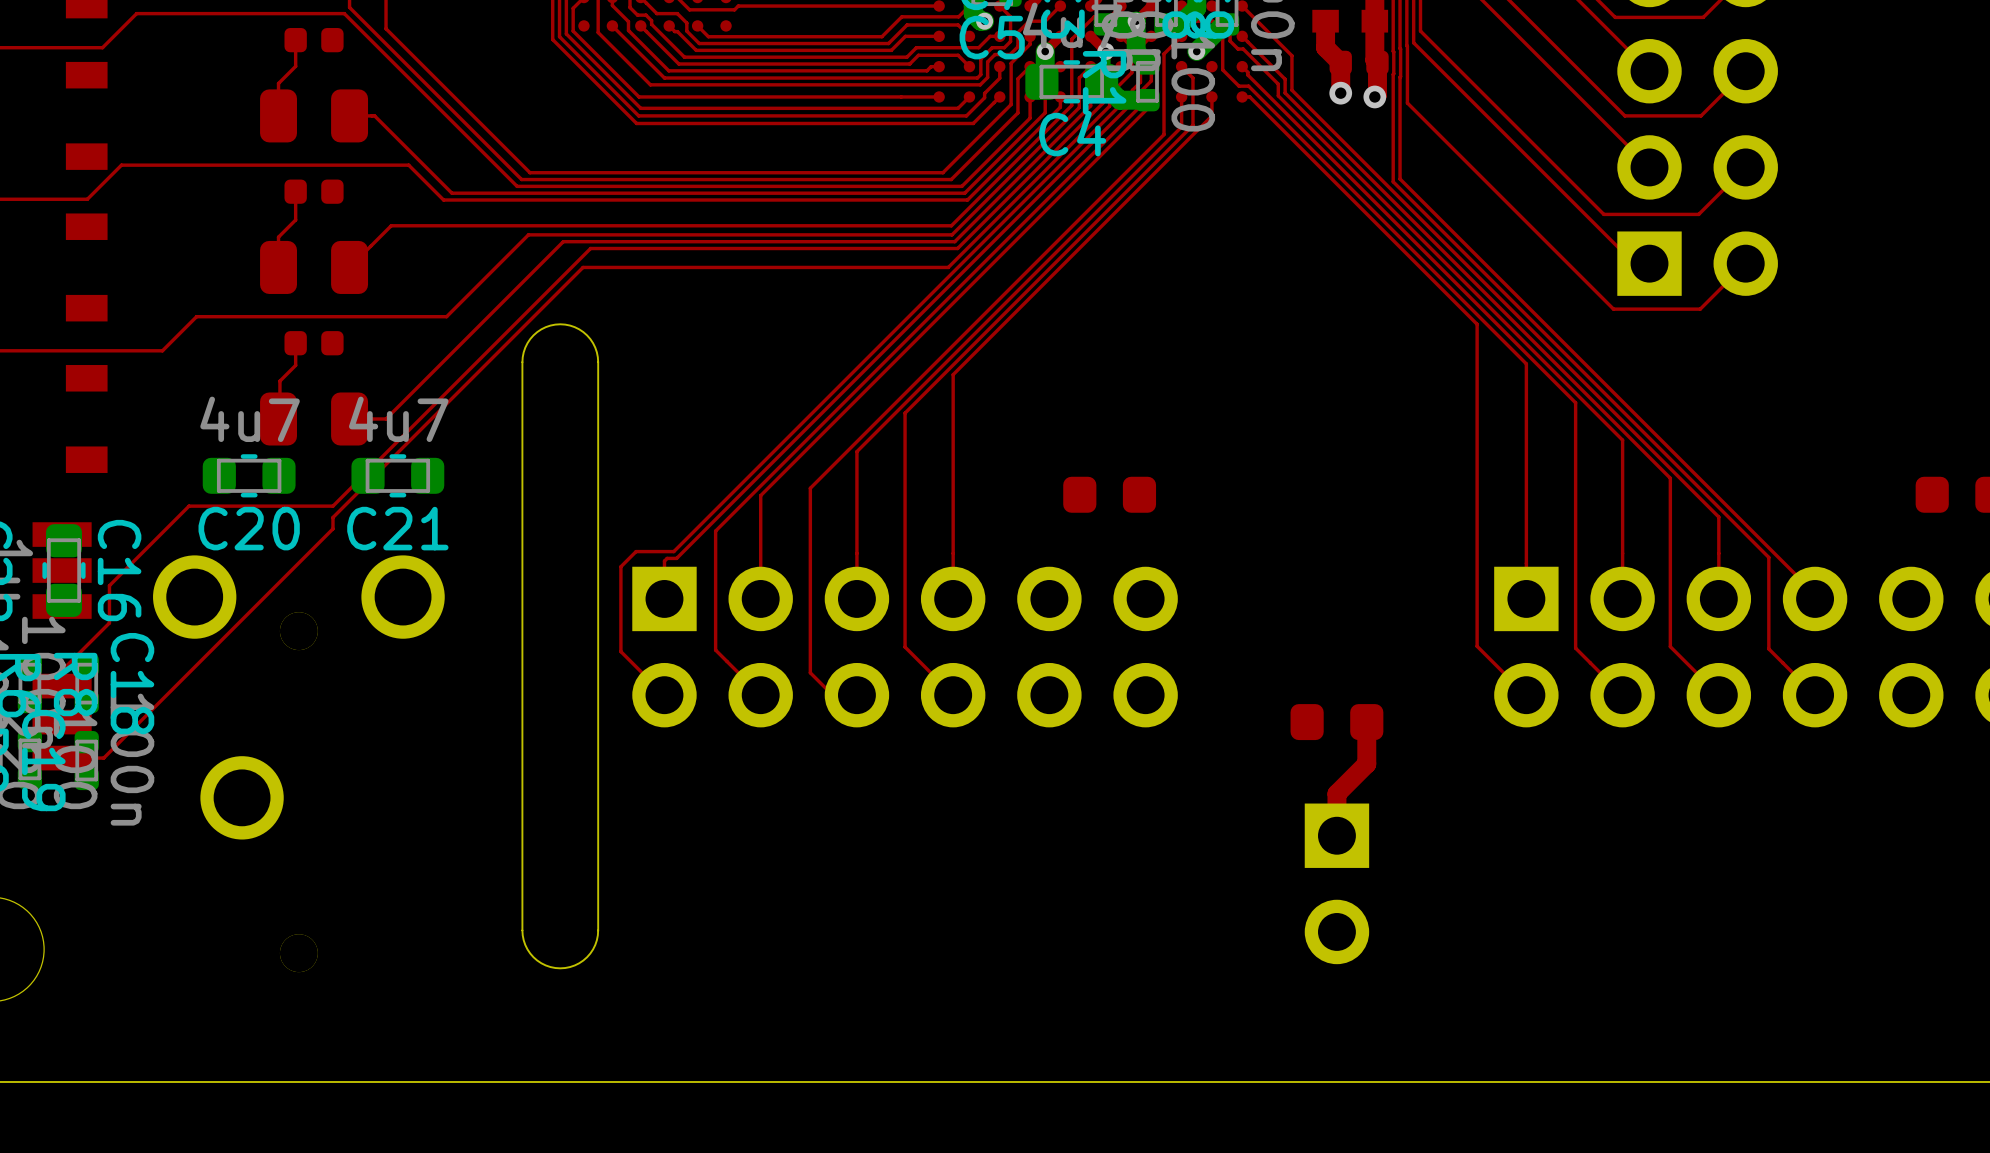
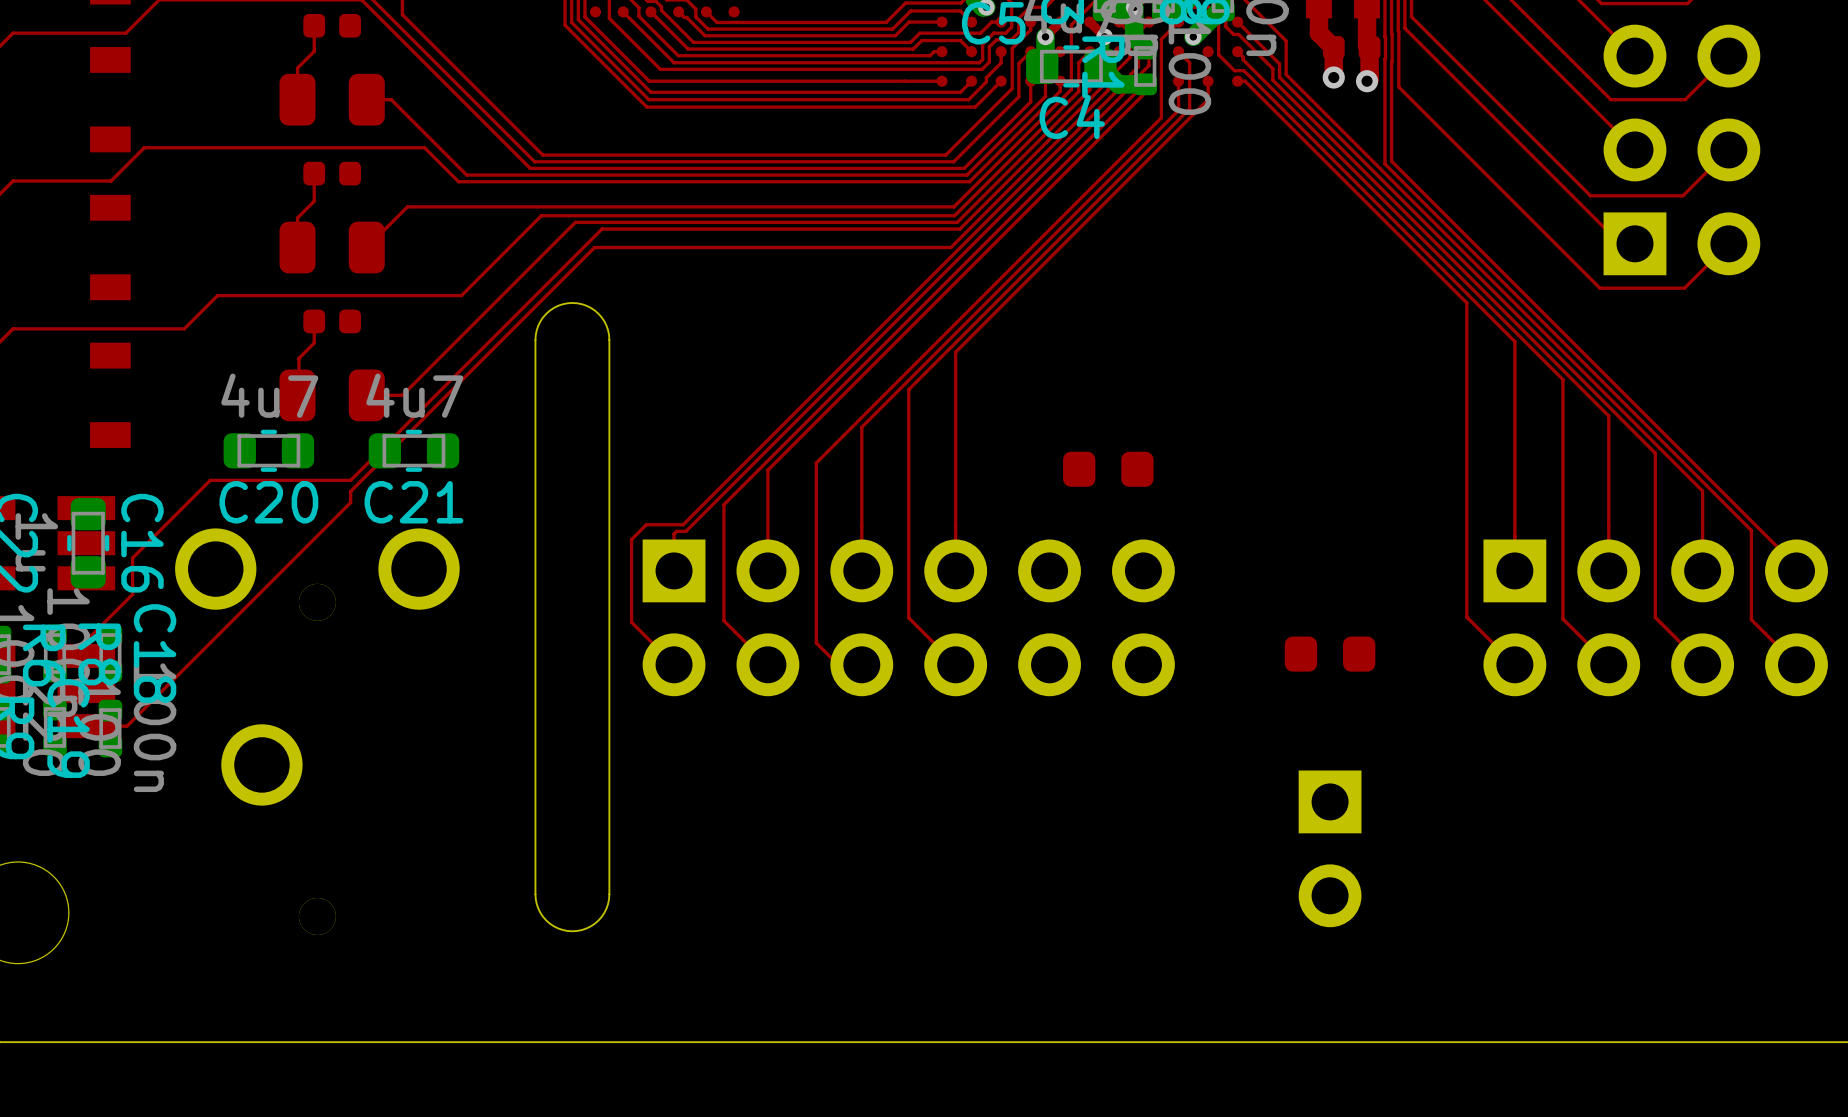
part position: (1336, 722) -> (1330, 654)
top track: (1366, 722) (1366, 763) (1336, 793) (1336, 835) -> none

